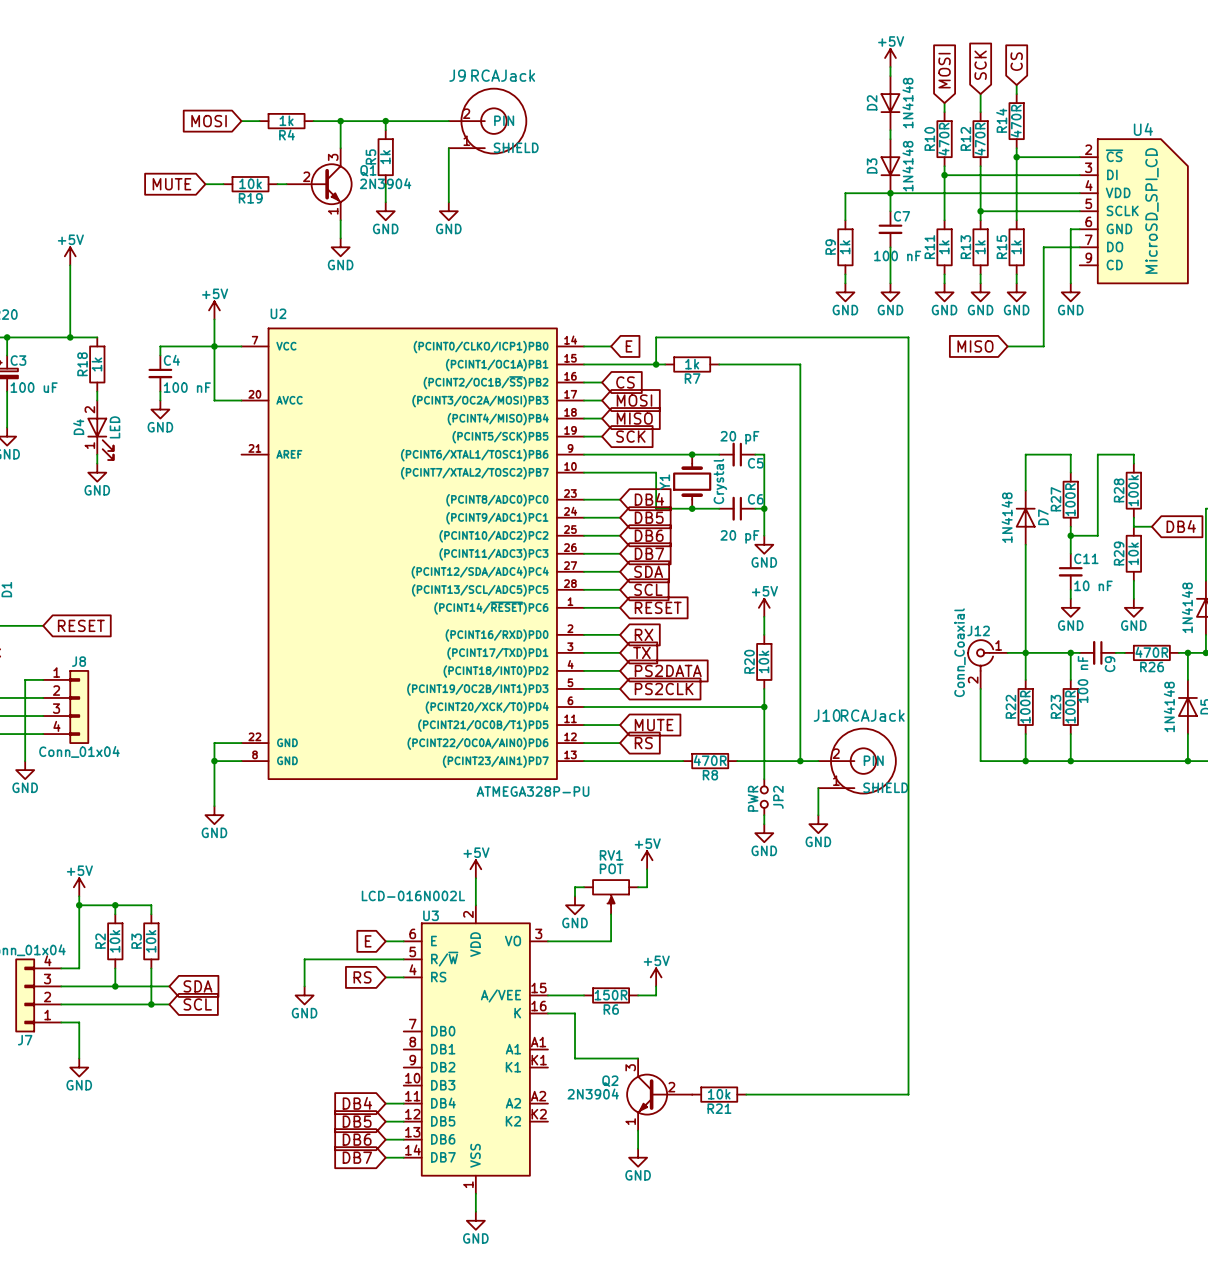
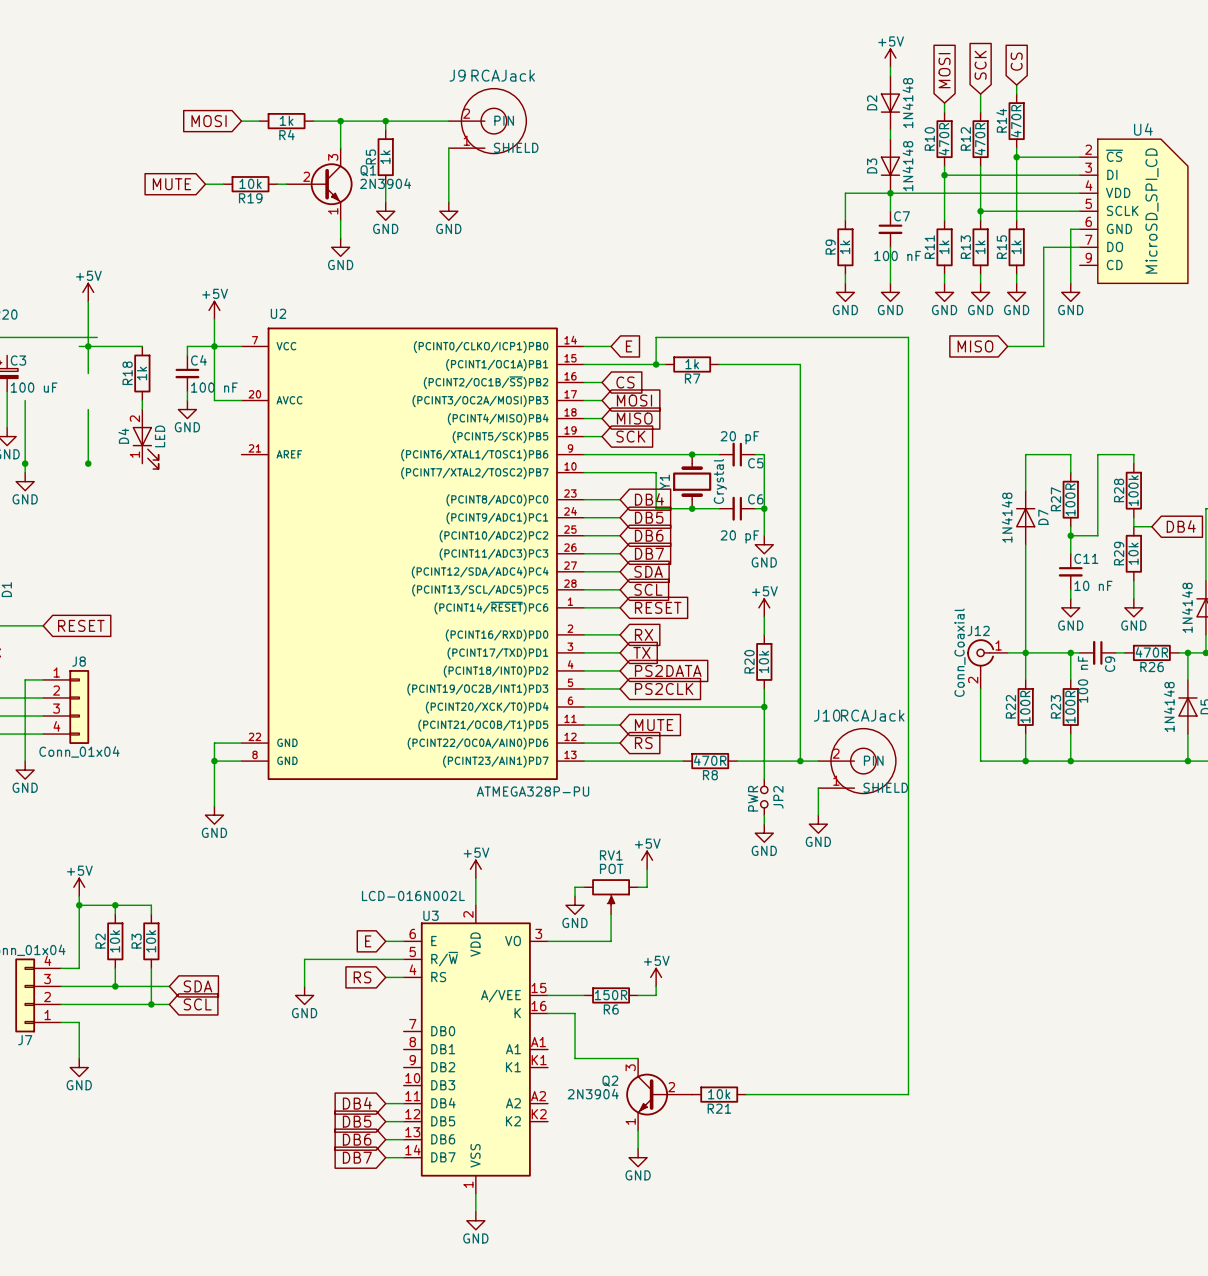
power symbol position: +5V (70, 256) -> +5V (88, 292)
wire: (70, 265) (70, 337) -> (88, 301) (88, 373)
wire: (7, 337) (7, 355) -> none
junction: (7, 337) -> none
junction position: (70, 337) -> (88, 346)
wire: none -> (79, 346) (142, 346)
wire: (187, 346) (160, 346) (160, 355) -> (187, 346) (187, 355)
R18 position: (97, 364) -> (142, 373)
C4 position: (160, 373) -> (187, 373)
wire: (97, 391) (97, 400) -> (187, 391) (187, 400)
wire: (160, 391) (160, 400) -> (142, 400) (142, 409)
wire: none -> (25, 400) (25, 472)
wire: none -> (88, 409) (88, 463)
power symbol position: GND (160, 409) -> GND (187, 409)
D4 position: (100, 430) -> (145, 439)
wire: (97, 454) (97, 463) -> none
junction: none -> (25, 463)
junction: none -> (88, 463)
power symbol: GND (97, 472) -> none
power symbol: none -> GND (25, 481)

